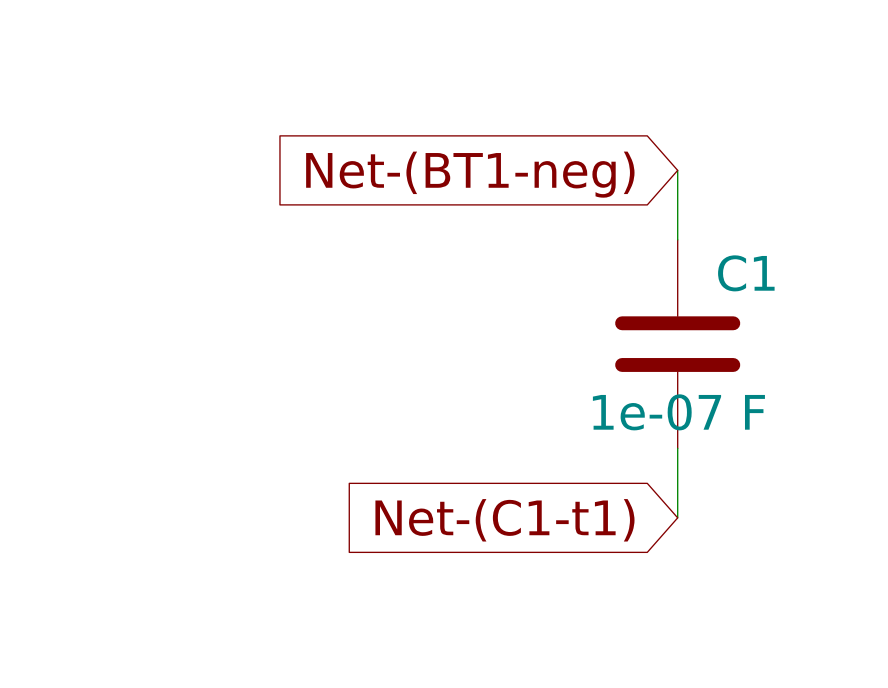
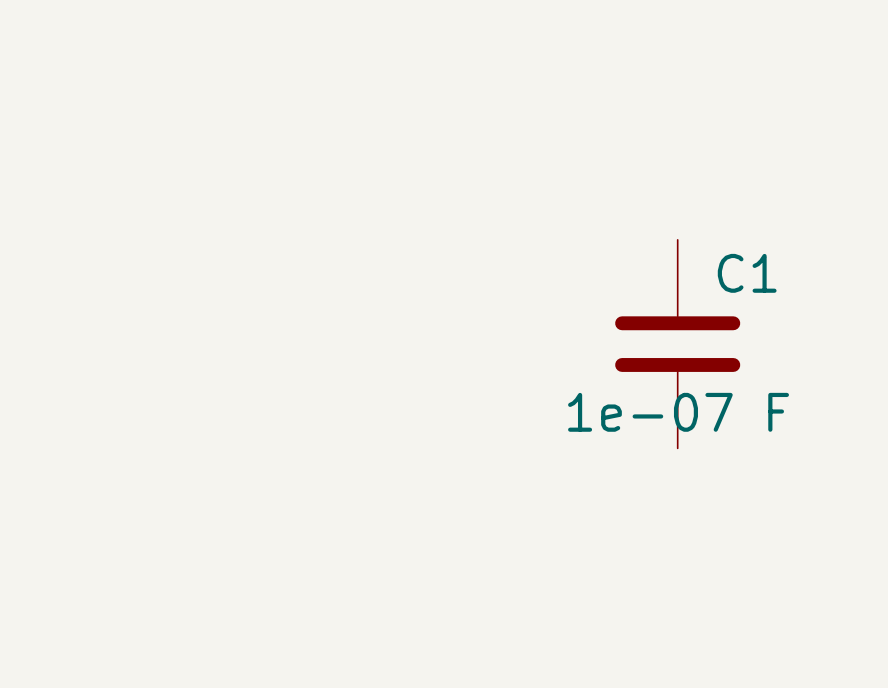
wire: (677, 170) (677, 239) -> none
global label: Net-(BT1-neg) (470, 174) -> none
wire: (677, 448) (677, 517) -> none
global label: Net-(C1-t1) (504, 520) -> none

